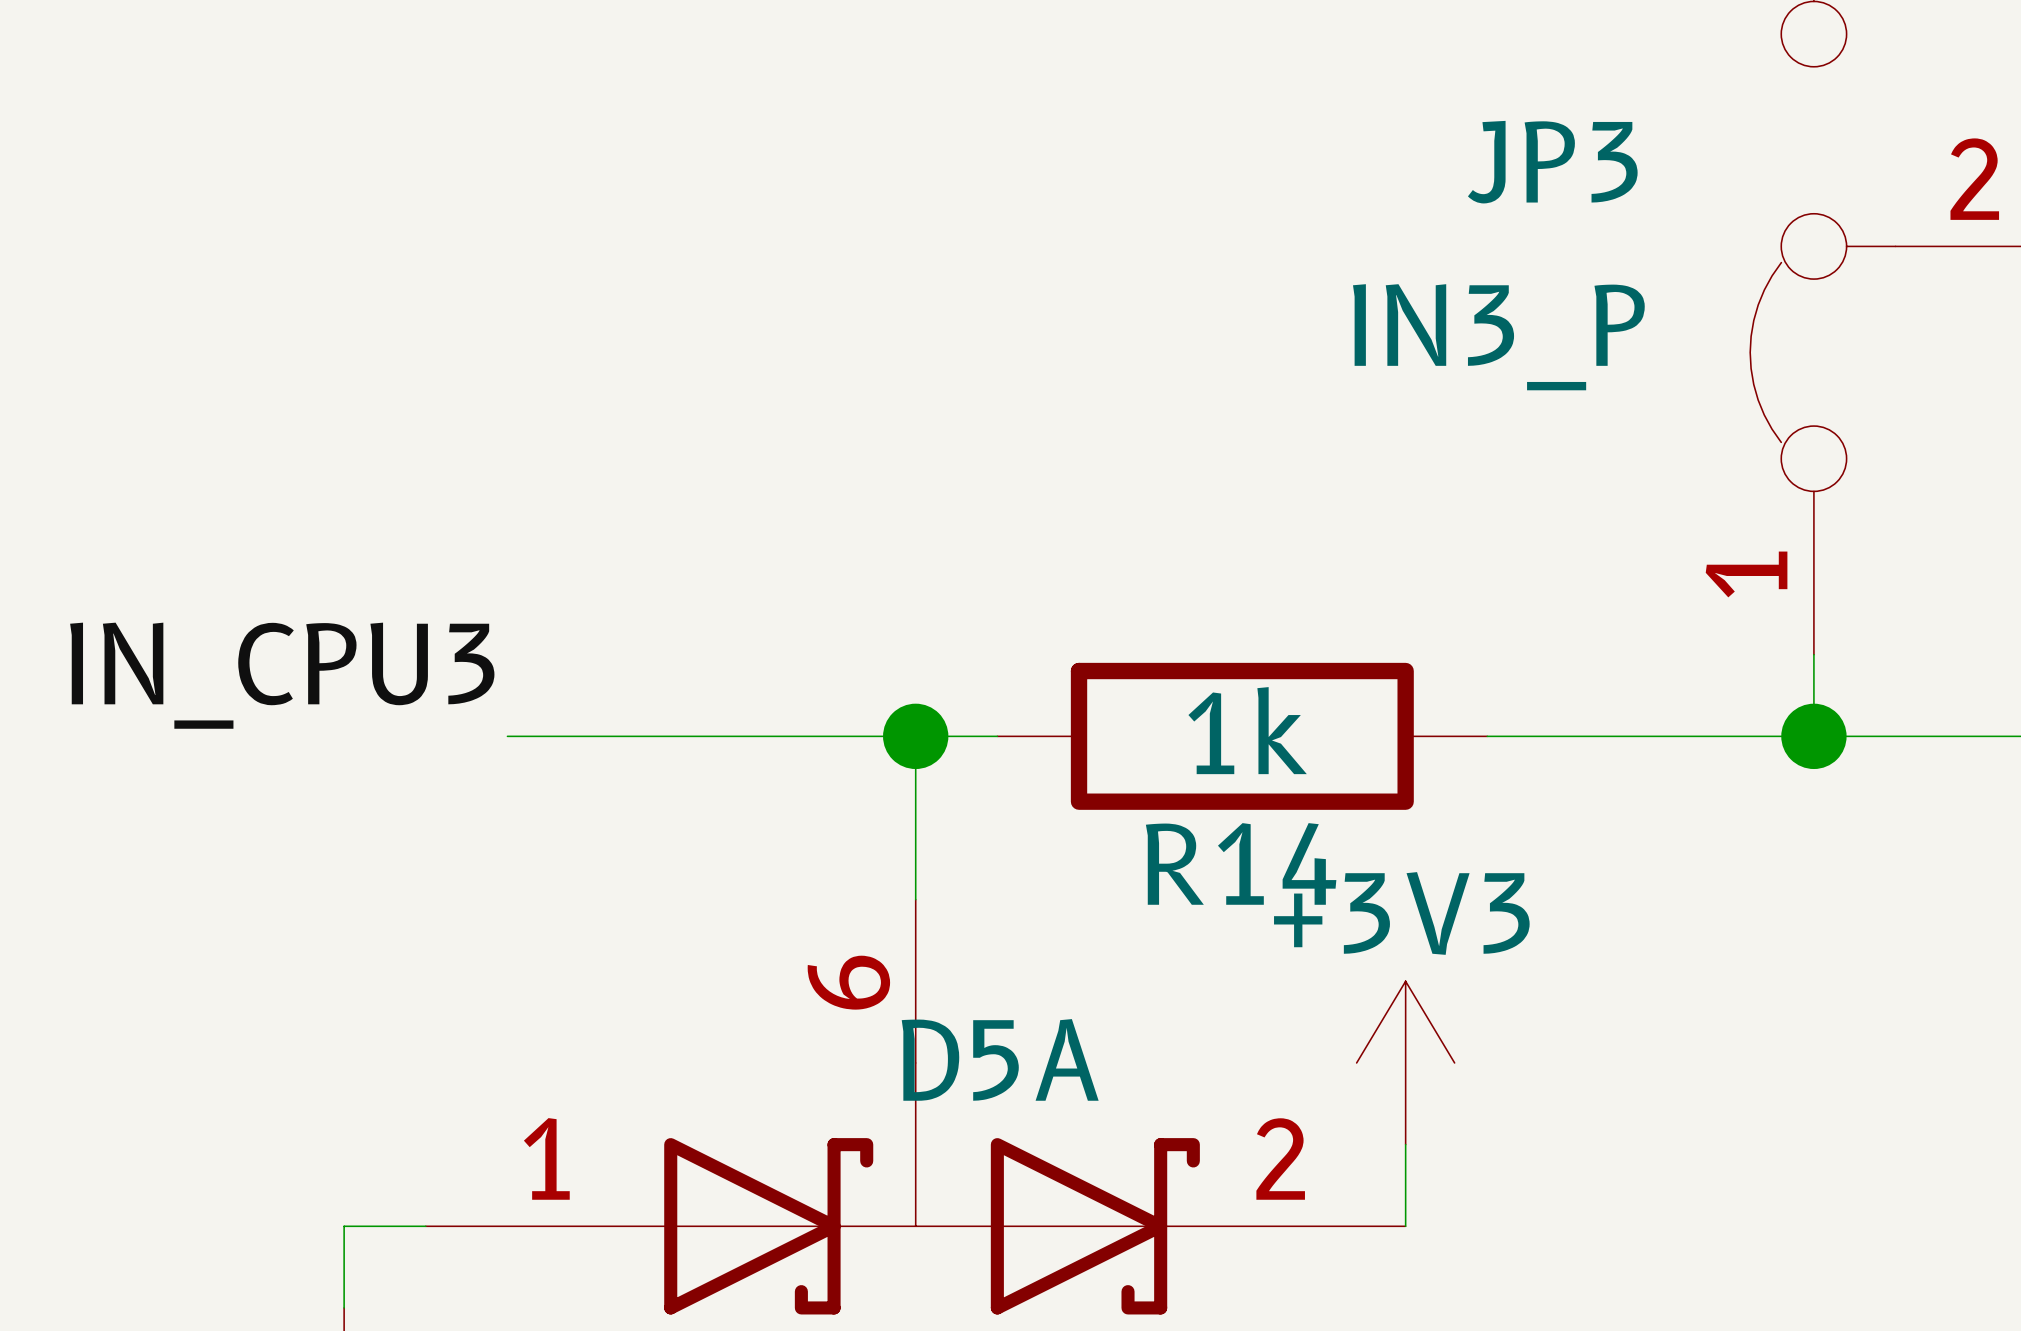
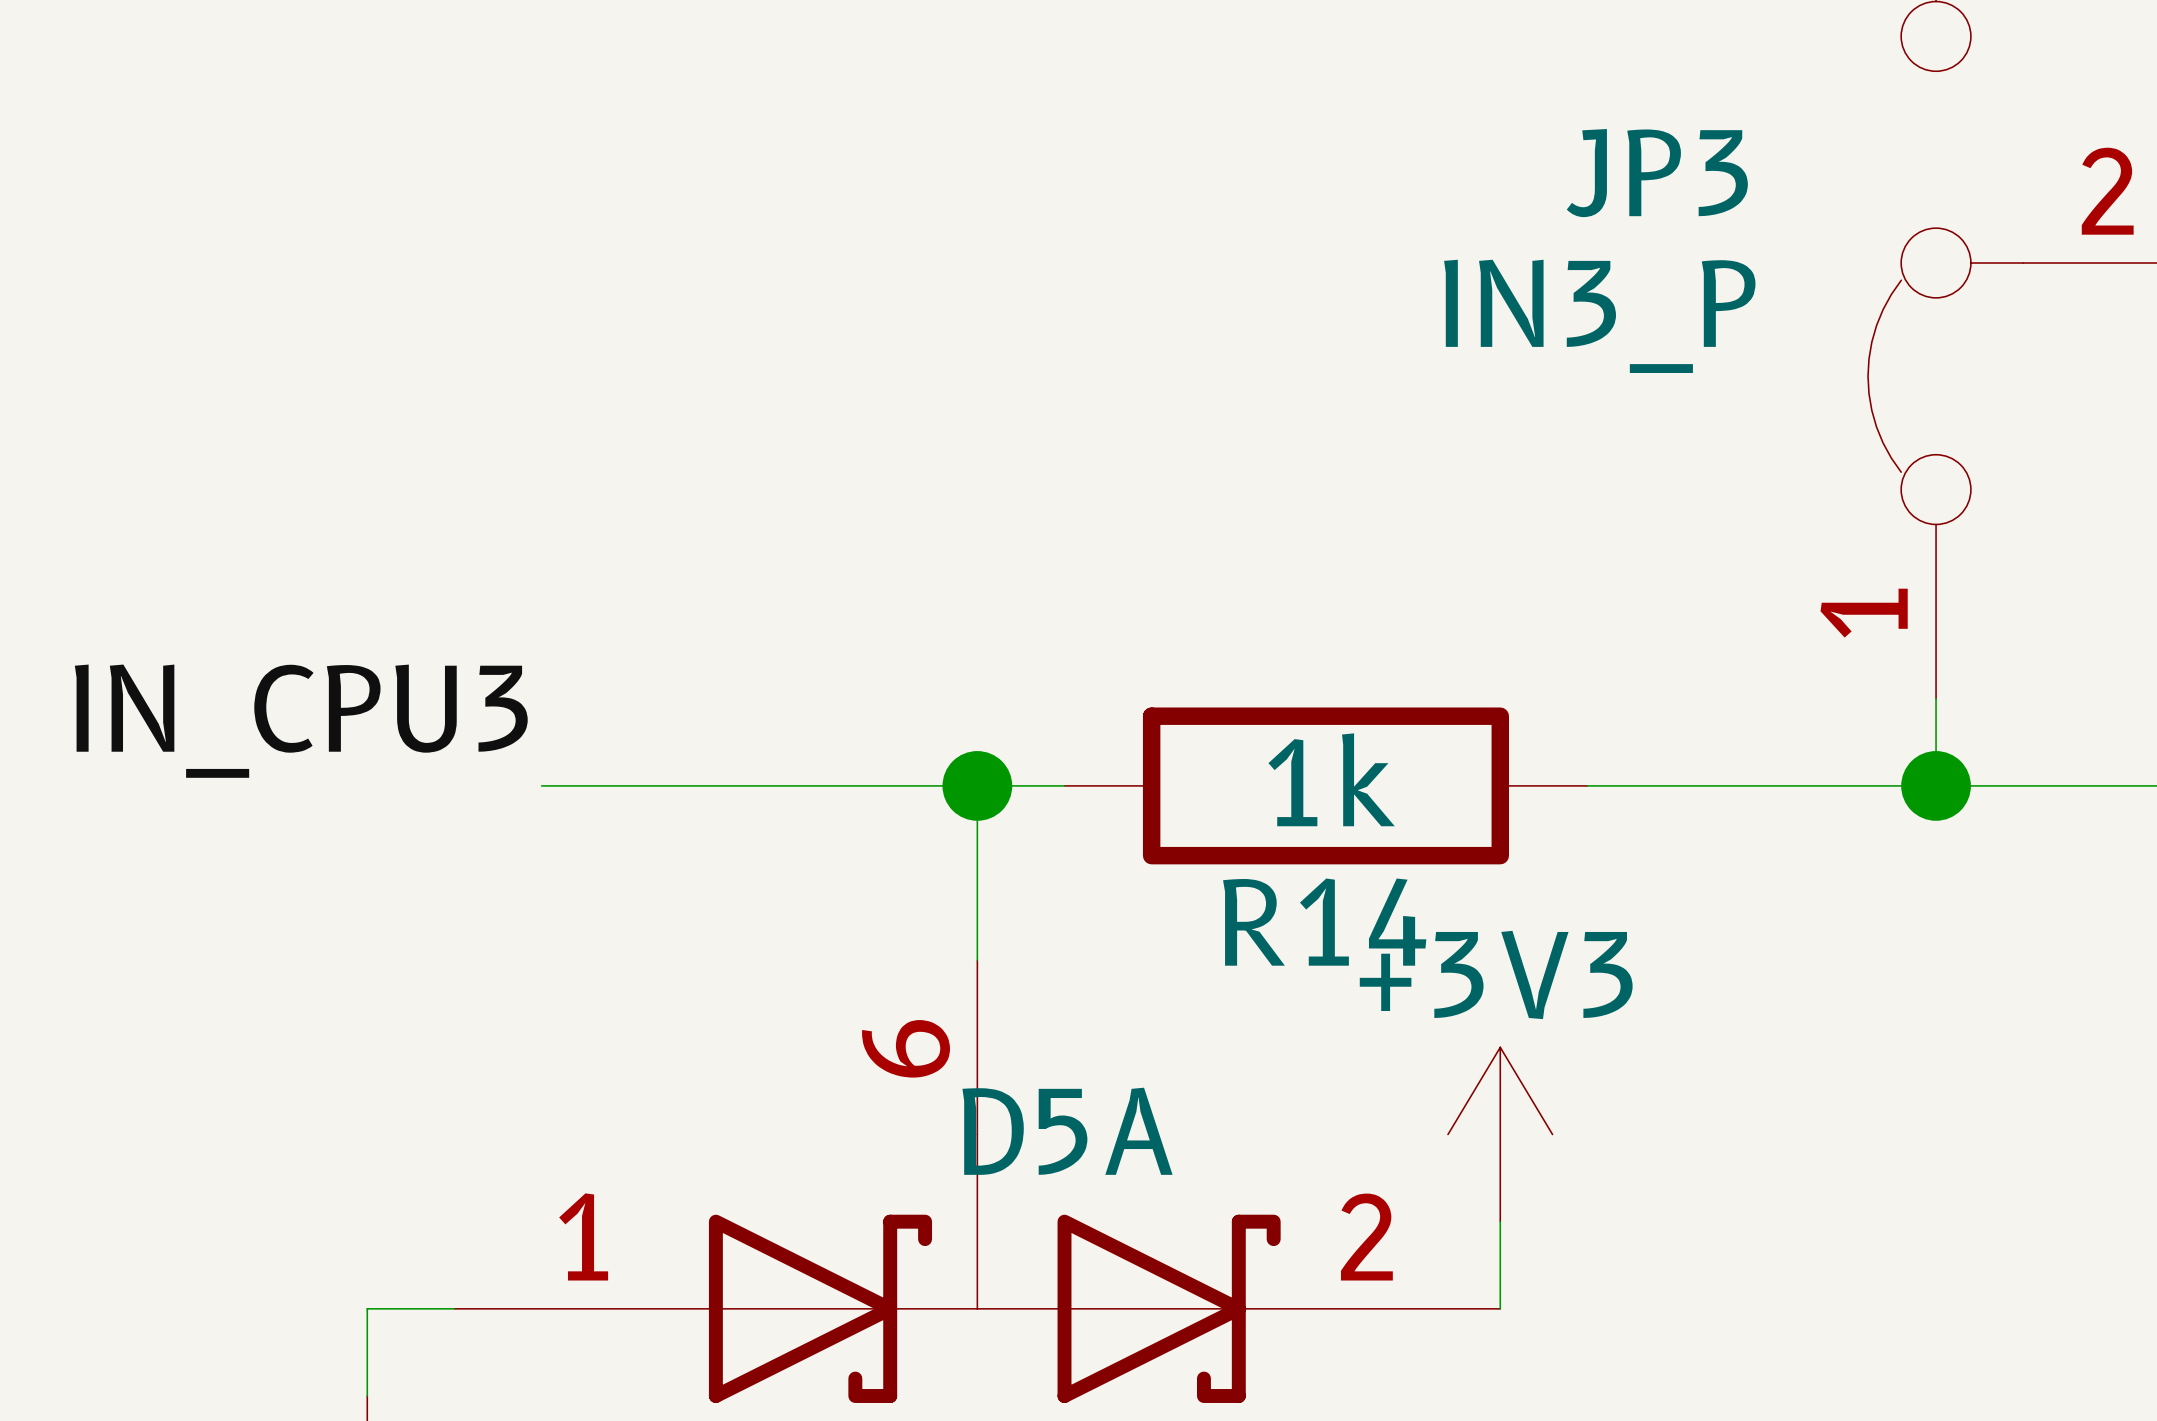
JP3 value position: IN3_P (1498, 337) -> IN3_P (1599, 316)

